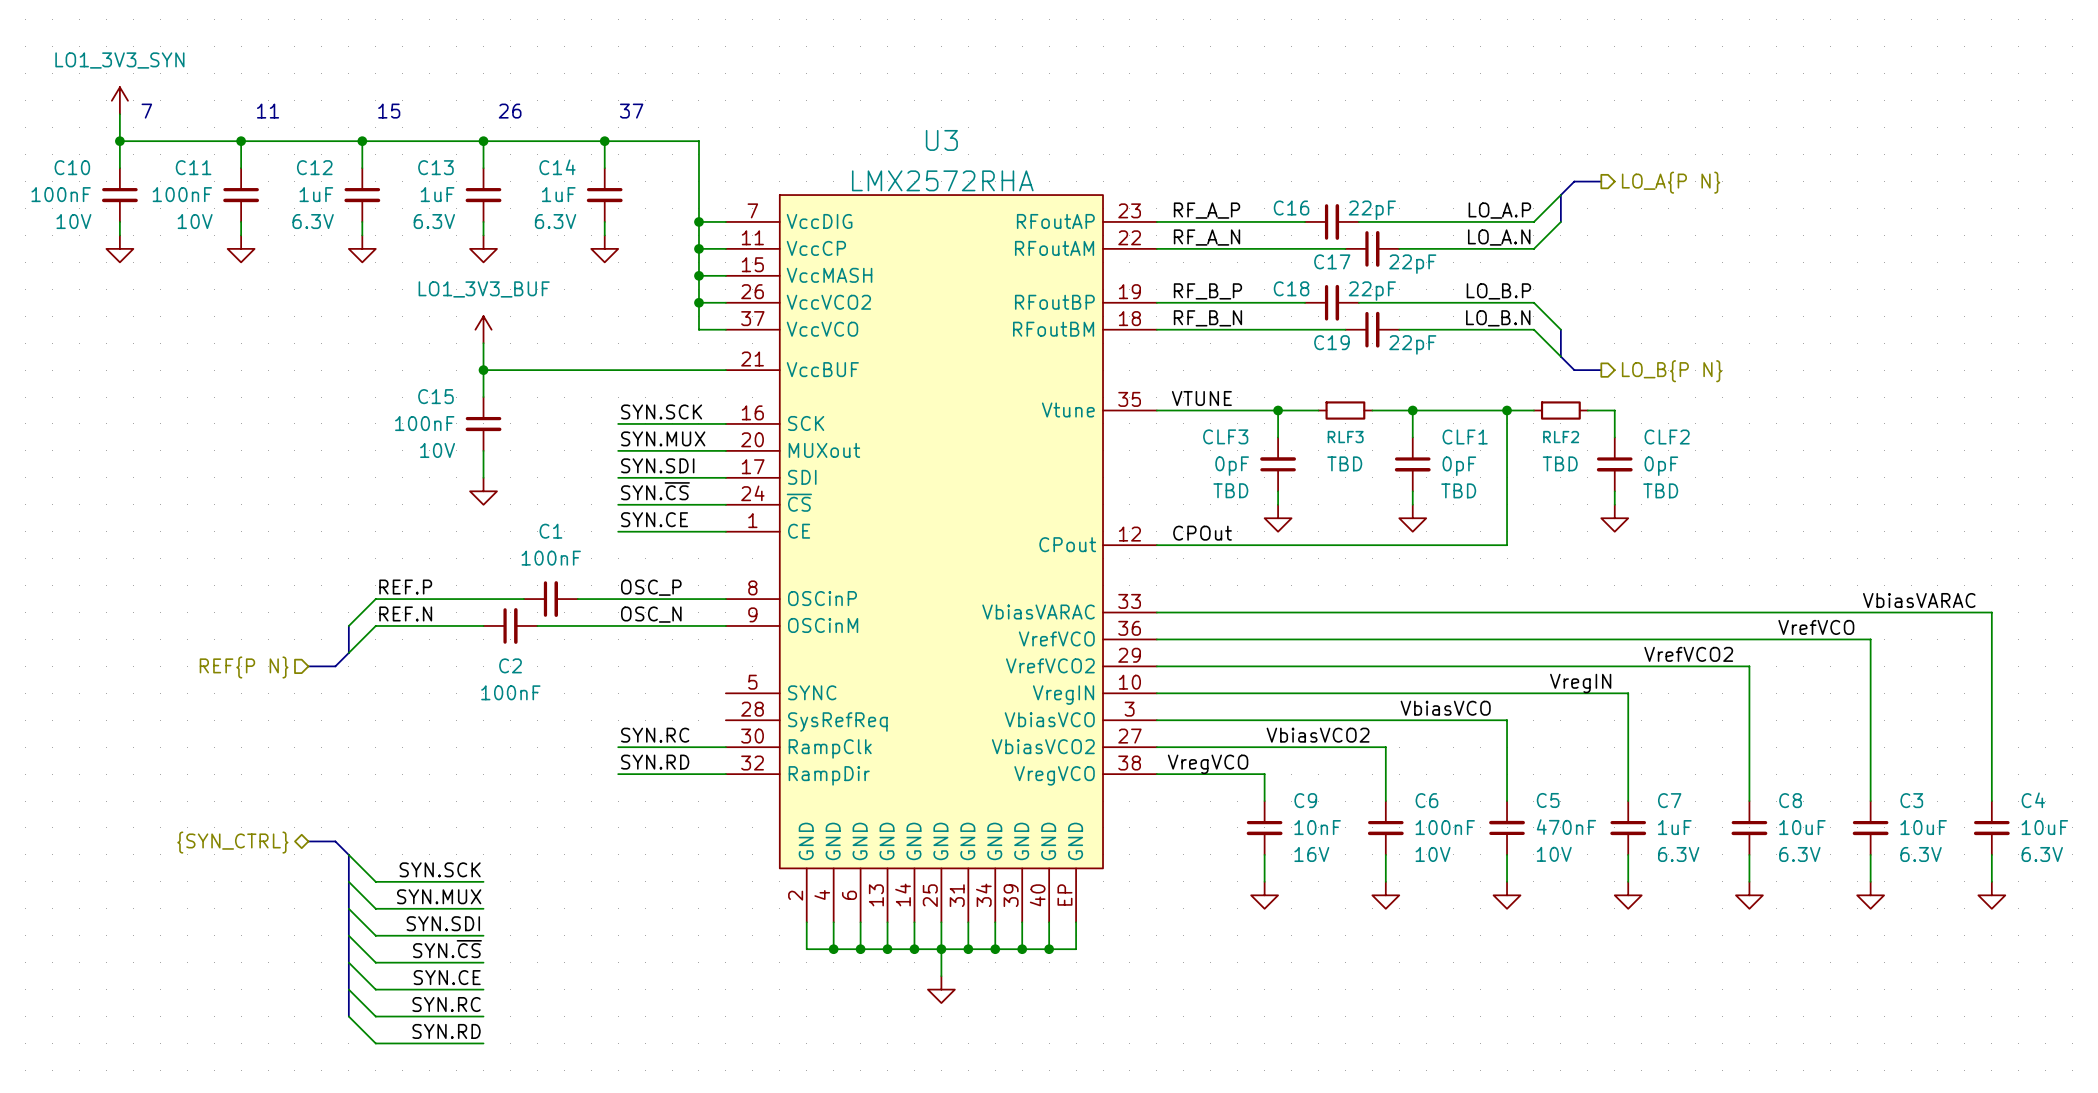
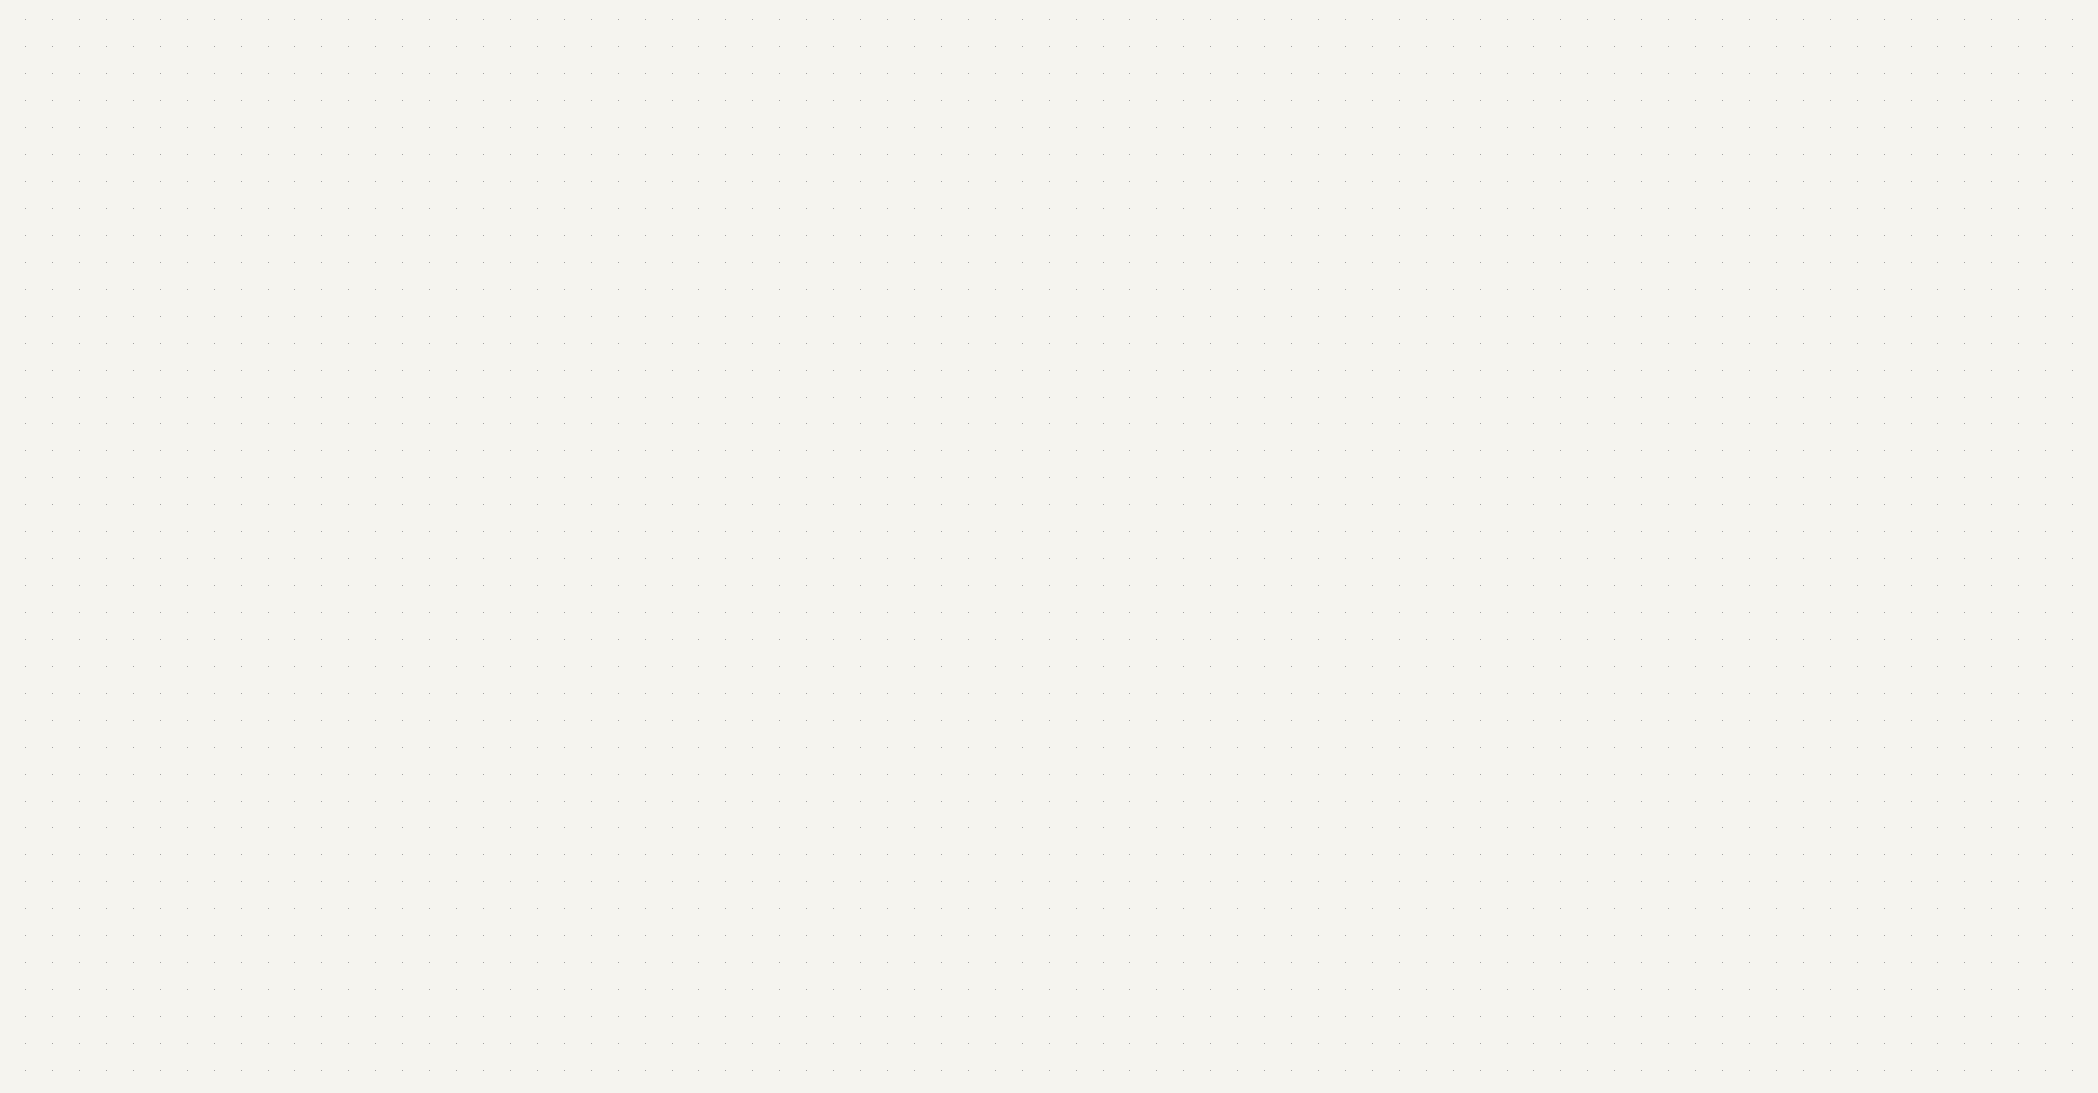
power symbol: LO1_3V3_SYN (119, 100) -> none
text: 7 (146, 111) -> none
text: 11 (268, 111) -> none
text: 15 (389, 111) -> none
text: 26 (510, 111) -> none
text: 37 (631, 111) -> none
wire: (119, 114) (119, 168) -> none
wire: (119, 141) (698, 141) (698, 329) (725, 329) -> none
junction: (119, 141) -> none
wire: (241, 141) (241, 168) -> none
junction: (241, 141) -> none
wire: (362, 141) (362, 168) -> none
junction: (362, 141) -> none
wire: (483, 141) (483, 168) -> none
junction: (483, 141) -> none
wire: (604, 141) (604, 168) -> none
junction: (604, 141) -> none
bus: (1601, 181) (1574, 181) (1560, 195) (1560, 221) -> none
hierarchical label: LO_A{P N} (1671, 182) -> none
C10: 100nF (119, 195) -> none
C11: 100nF (241, 195) -> none
C12: 1uF (362, 195) -> none
C13: 1uF (483, 195) -> none
C14: 1uF (604, 195) -> none
wire: (1560, 195) (1533, 221) (1358, 221) -> none
label: RF_A_P (1207, 210) -> none
label: LO_A.P (1499, 210) -> none
wire: (119, 221) (119, 235) -> none
wire: (241, 221) (241, 235) -> none
wire: (362, 221) (362, 235) -> none
wire: (483, 221) (483, 235) -> none
wire: (604, 221) (604, 235) -> none
wire: (698, 221) (725, 221) -> none
junction: (698, 221) -> none
wire: (1156, 221) (1305, 221) -> none
C16: 22pF (1331, 221) -> none
wire: (1560, 221) (1533, 248) (1399, 248) -> none
label: RF_A_N (1207, 237) -> none
label: LO_A.N (1499, 237) -> none
power symbol: (119, 248) -> none
power symbol: (241, 248) -> none
power symbol: (362, 248) -> none
power symbol: (483, 248) -> none
power symbol: (604, 248) -> none
wire: (698, 248) (725, 248) -> none
junction: (698, 248) -> none
wire: (1156, 248) (1345, 248) -> none
C17: 22pF (1372, 248) -> none
wire: (698, 275) (725, 275) -> none
junction: (698, 275) -> none
label: RF_B_P (1207, 291) -> none
label: LO_B.P (1498, 291) -> none
wire: (698, 302) (725, 302) -> none
junction: (698, 302) -> none
wire: (1156, 302) (1305, 302) -> none
C18: 22pF (1331, 302) -> none
wire: (1358, 302) (1533, 302) (1560, 329) -> none
label: RF_B_N (1207, 318) -> none
label: LO_B.N (1498, 318) -> none
power symbol: LO1_3V3_BUF (483, 329) -> none
wire: (1156, 329) (1345, 329) -> none
C19: 22pF (1372, 329) -> none
wire: (1399, 329) (1533, 329) (1560, 356) -> none
bus: (1560, 329) (1560, 356) (1574, 370) (1601, 370) -> none
wire: (483, 343) (483, 397) -> none
wire: (483, 370) (725, 370) -> none
junction: (483, 370) -> none
hierarchical label: LO_B{P N} (1672, 371) -> none
label: VTUNE (1201, 398) -> none
wire: (1156, 410) (1318, 410) -> none
wire: (1278, 410) (1278, 437) -> none
junction: (1278, 410) -> none
RLF3: TBD (1345, 410) -> none
wire: (1372, 410) (1533, 410) -> none
wire: (1412, 410) (1412, 437) -> none
junction: (1412, 410) -> none
wire: (1507, 410) (1507, 545) (1156, 545) -> none
junction: (1507, 410) -> none
RLF2: TBD (1560, 410) -> none
wire: (1587, 410) (1614, 410) (1614, 437) -> none
label: SYN.SCK (661, 411) -> none
C15: 100nF (483, 423) -> none
wire: (618, 423) (725, 423) -> none
label: SYN.MUX (663, 438) -> none
wire: (483, 450) (483, 477) -> none
wire: (618, 450) (725, 450) -> none
CLF3: 0pF (1278, 464) -> none
CLF1: 0pF (1412, 464) -> none
CLF2: 0pF (1614, 464) -> none
label: SYN.SDI (657, 465) -> none
wire: (618, 477) (725, 477) -> none
power symbol: (483, 491) -> none
label: SYN.~{CS} (655, 491) -> none
wire: (1278, 491) (1278, 504) -> none
wire: (1412, 491) (1412, 504) -> none
wire: (1614, 491) (1614, 504) -> none
wire: (618, 504) (725, 504) -> none
power symbol: (1278, 518) -> none
power symbol: (1412, 518) -> none
power symbol: (1614, 518) -> none
label: SYN.CE (654, 519) -> none
wire: (618, 531) (725, 531) -> none
label: CPOut (1202, 533) -> none
U3: (941, 558) -> none
label: REF.P (405, 587) -> none
label: OSC_P (651, 587) -> none
wire: (523, 599) (375, 599) (348, 625) -> none
C1: 100nF (550, 599) -> none
wire: (577, 599) (725, 599) -> none
label: VbiasVARAC (1919, 600) -> none
wire: (1156, 612) (1991, 612) (1991, 801) -> none
label: REF.N (405, 613) -> none
label: OSC_N (651, 614) -> none
bus: (348, 625) (348, 652) (335, 666) (308, 666) -> none
wire: (483, 625) (375, 625) (348, 652) -> none
C2: 100nF (510, 625) -> none
wire: (537, 625) (725, 625) -> none
label: VrefVCO (1816, 627) -> none
wire: (1156, 639) (1870, 639) (1870, 801) -> none
label: VrefVCO2 (1688, 654) -> none
wire: (1156, 666) (1749, 666) (1749, 801) -> none
hierarchical label: REF{P N} (244, 667) -> none
label: VregIN (1580, 683) -> none
wire: (1156, 693) (1628, 693) (1628, 801) -> none
label: VbiasVCO (1445, 708) -> none
wire: (1156, 720) (1507, 720) (1507, 801) -> none
label: SYN.RC (655, 735) -> none
label: VbiasVCO2 (1318, 735) -> none
wire: (618, 747) (725, 747) -> none
wire: (1156, 747) (1385, 747) (1385, 801) -> none
label: SYN.RD (655, 762) -> none
label: VregVCO (1208, 764) -> none
wire: (618, 774) (725, 774) -> none
wire: (1156, 774) (1264, 774) (1264, 801) -> none
C9: 10nF (1264, 827) -> none
C6: 100nF (1385, 827) -> none
C5: 470nF (1507, 827) -> none
C7: 1uF (1628, 827) -> none
C8: 10uF (1749, 827) -> none
C3: 10uF (1870, 827) -> none
C4: 10uF (1991, 827) -> none
bus: (308, 841) (335, 841) (348, 854) (348, 1016) -> none
hierarchical label: {SYN_CTRL} (232, 842) -> none
wire: (348, 854) (375, 881) (483, 881) -> none
wire: (1264, 854) (1264, 881) -> none
wire: (1385, 854) (1385, 881) -> none
wire: (1507, 854) (1507, 881) -> none
wire: (1628, 854) (1628, 881) -> none
wire: (1749, 854) (1749, 881) -> none
wire: (1870, 854) (1870, 881) -> none
wire: (1991, 854) (1991, 881) -> none
label: SYN.SCK (440, 869) -> none
wire: (348, 881) (375, 908) (483, 908) -> none
power symbol: (1264, 895) -> none
power symbol: (1385, 895) -> none
power symbol: (1507, 895) -> none
power symbol: (1628, 895) -> none
power symbol: (1749, 895) -> none
power symbol: (1870, 895) -> none
power symbol: (1991, 895) -> none
label: SYN.MUX (439, 896) -> none
wire: (348, 908) (375, 935) (483, 935) -> none
wire: (806, 922) (806, 949) (1076, 949) (1076, 922) -> none
wire: (833, 922) (833, 949) -> none
wire: (860, 922) (860, 949) -> none
wire: (887, 922) (887, 949) -> none
wire: (914, 922) (914, 949) -> none
wire: (941, 922) (941, 976) -> none
wire: (968, 922) (968, 949) -> none
wire: (995, 922) (995, 949) -> none
wire: (1022, 922) (1022, 949) -> none
wire: (1049, 922) (1049, 949) -> none
label: SYN.SDI (443, 923) -> none
wire: (348, 935) (375, 962) (483, 962) -> none
label: SYN.~{CS} (447, 949) -> none
junction: (833, 949) -> none
junction: (860, 949) -> none
junction: (887, 949) -> none
junction: (914, 949) -> none
junction: (941, 949) -> none
junction: (968, 949) -> none
junction: (995, 949) -> none
junction: (1022, 949) -> none
junction: (1049, 949) -> none
wire: (348, 962) (375, 989) (483, 989) -> none
label: SYN.CE (447, 977) -> none
wire: (348, 989) (375, 1016) (483, 1016) -> none
power symbol: (941, 989) -> none
label: SYN.RC (446, 1004) -> none
wire: (348, 1016) (375, 1043) (483, 1043) -> none
label: SYN.RD (446, 1031) -> none

